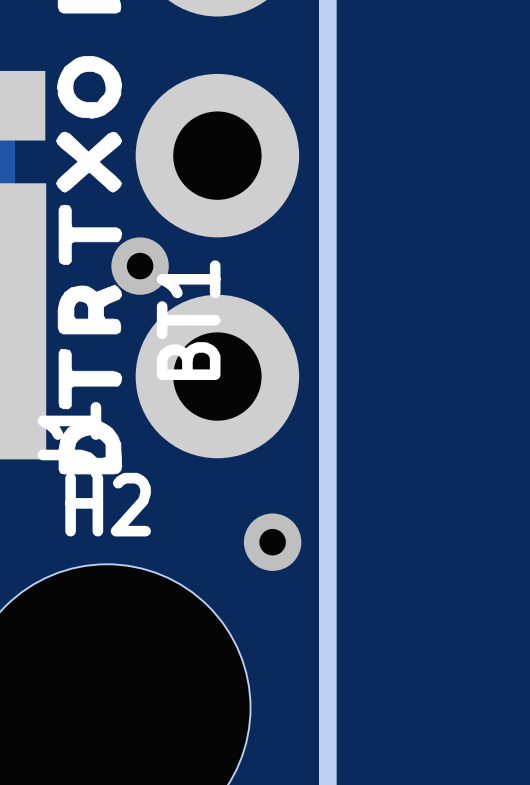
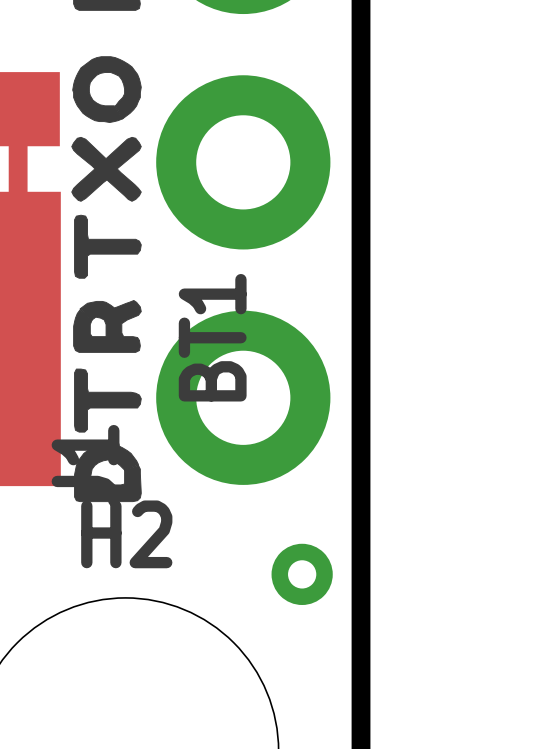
via: (140, 266) -> none

